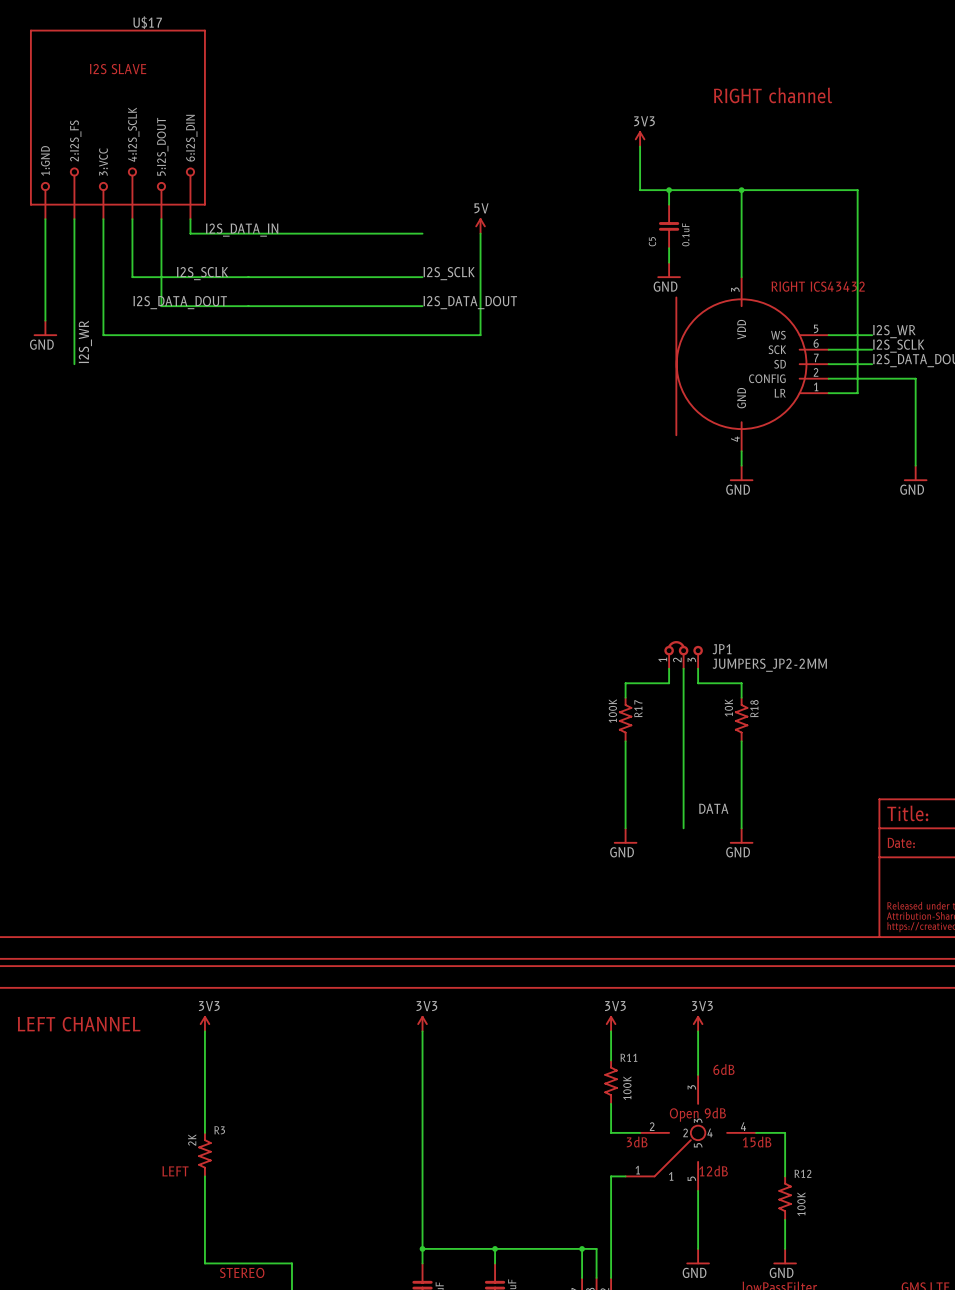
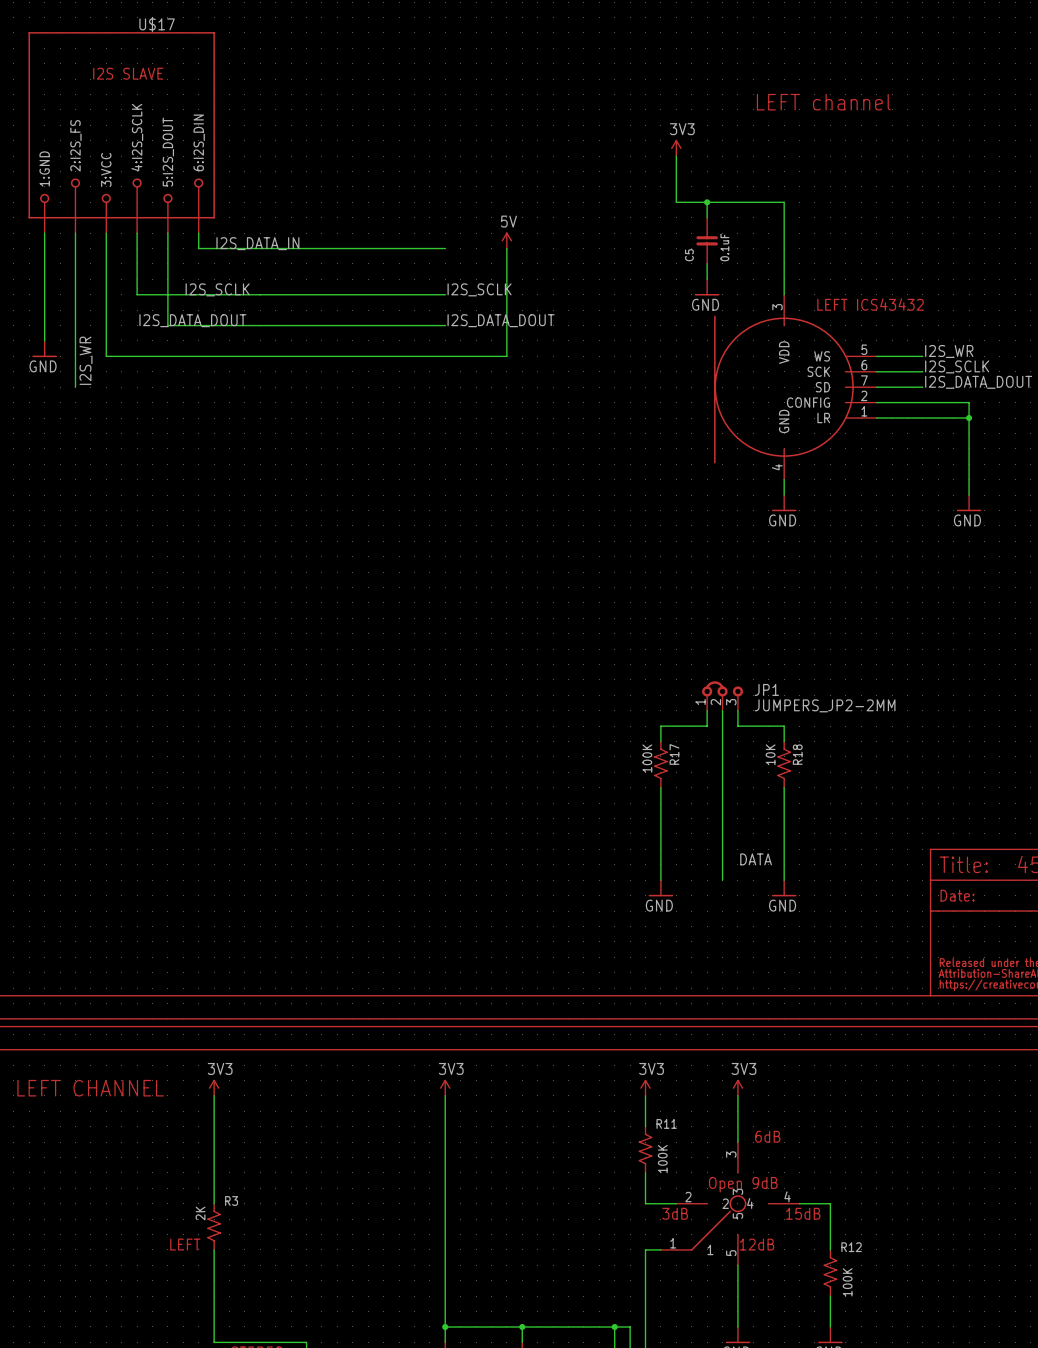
text: RIGHT channel (773, 95) -> LEFT channel (823, 102)
wire: (741, 190) (857, 190) (857, 393) -> (969, 418) (907, 418)
junction: (741, 190) -> none
text: RIGHT ICS43432 (818, 286) -> LEFT ICS43432 (870, 304)
junction: none -> (969, 418)

